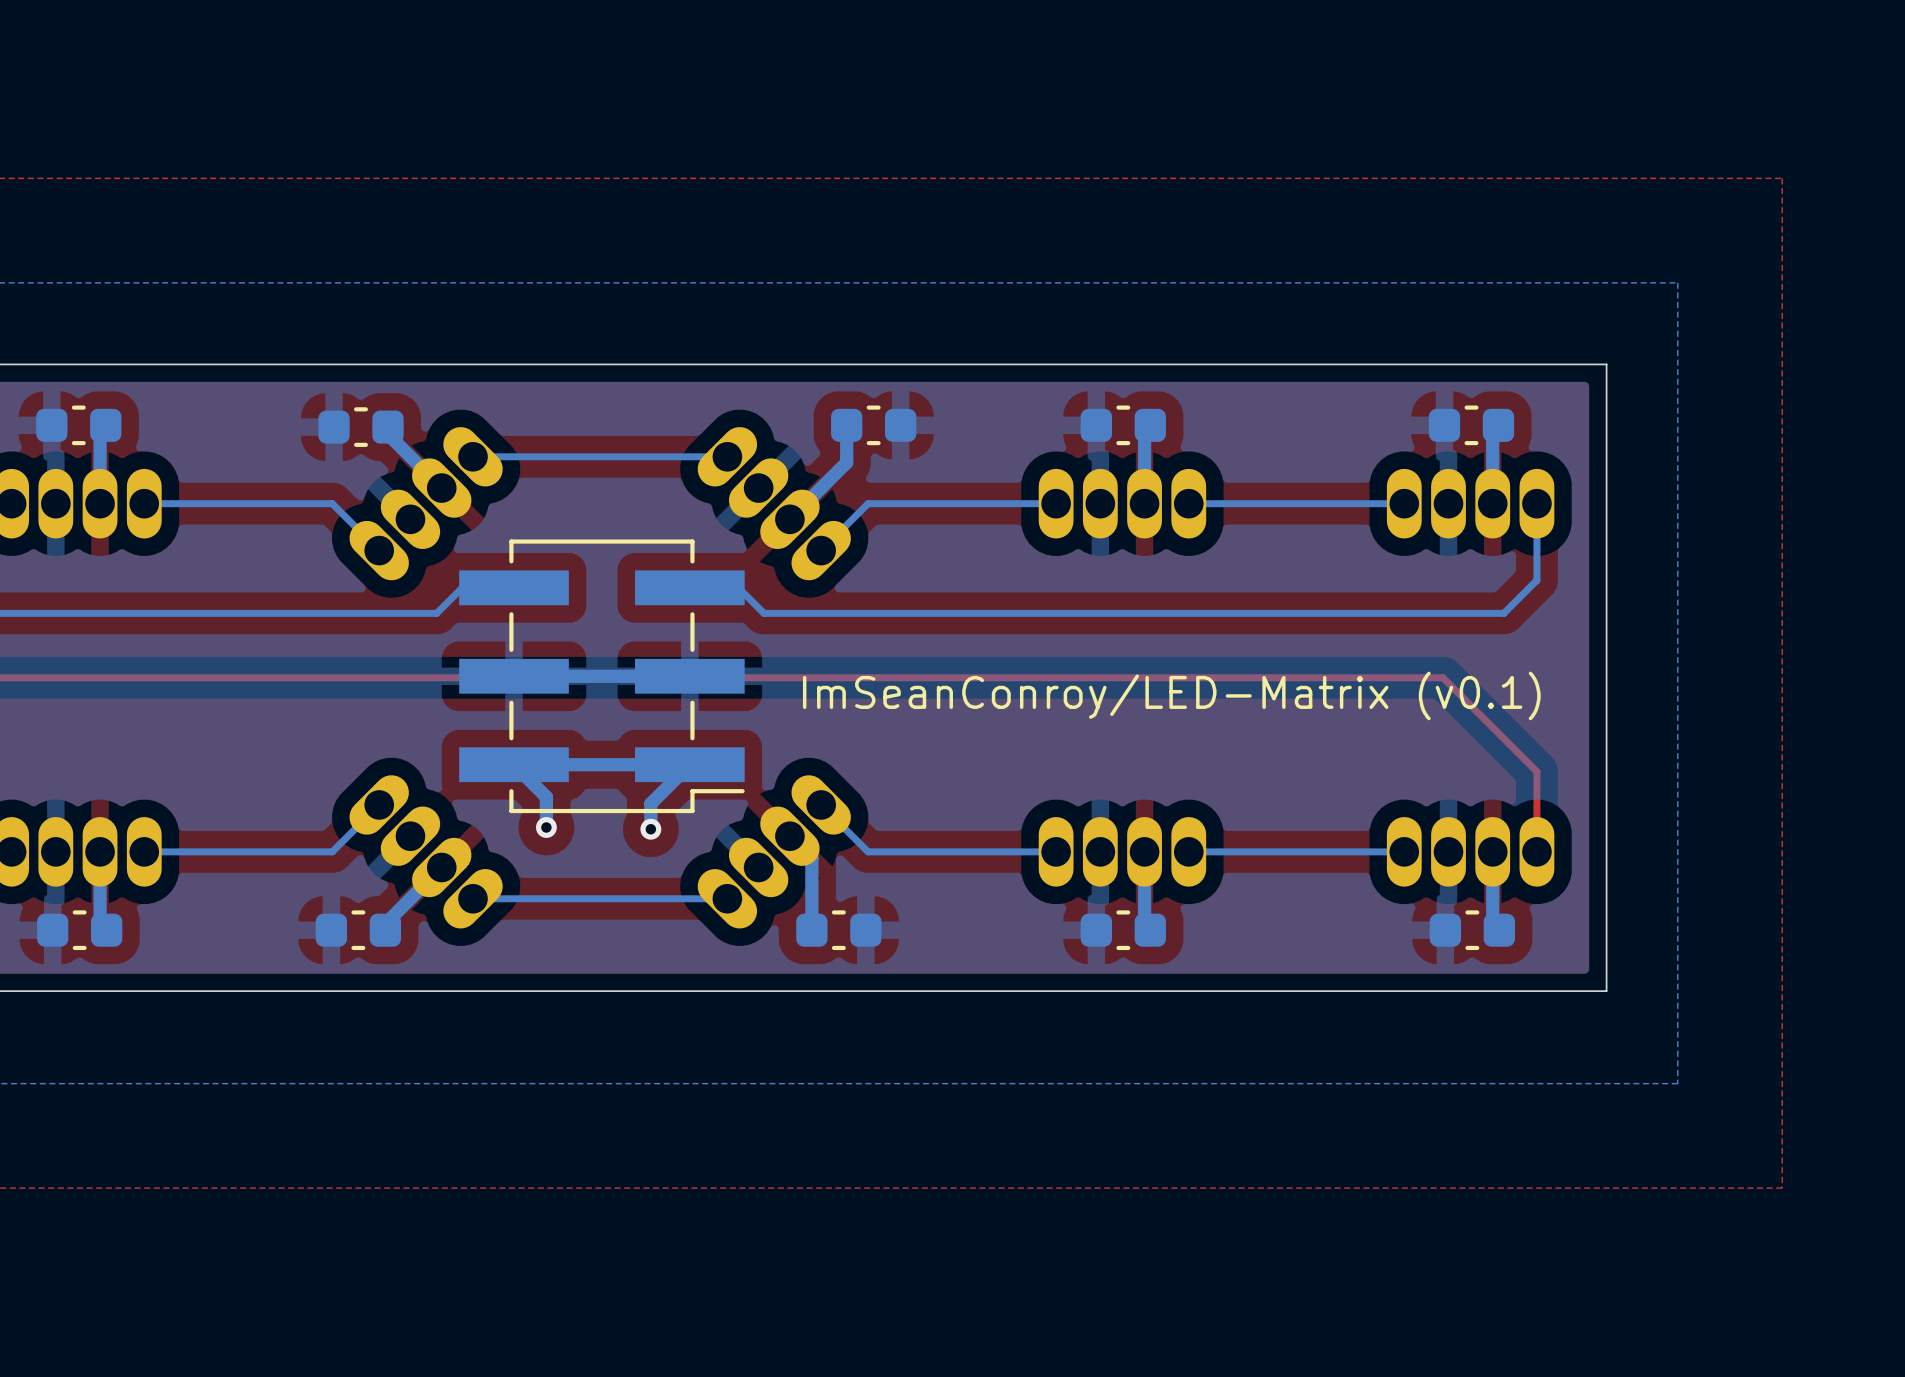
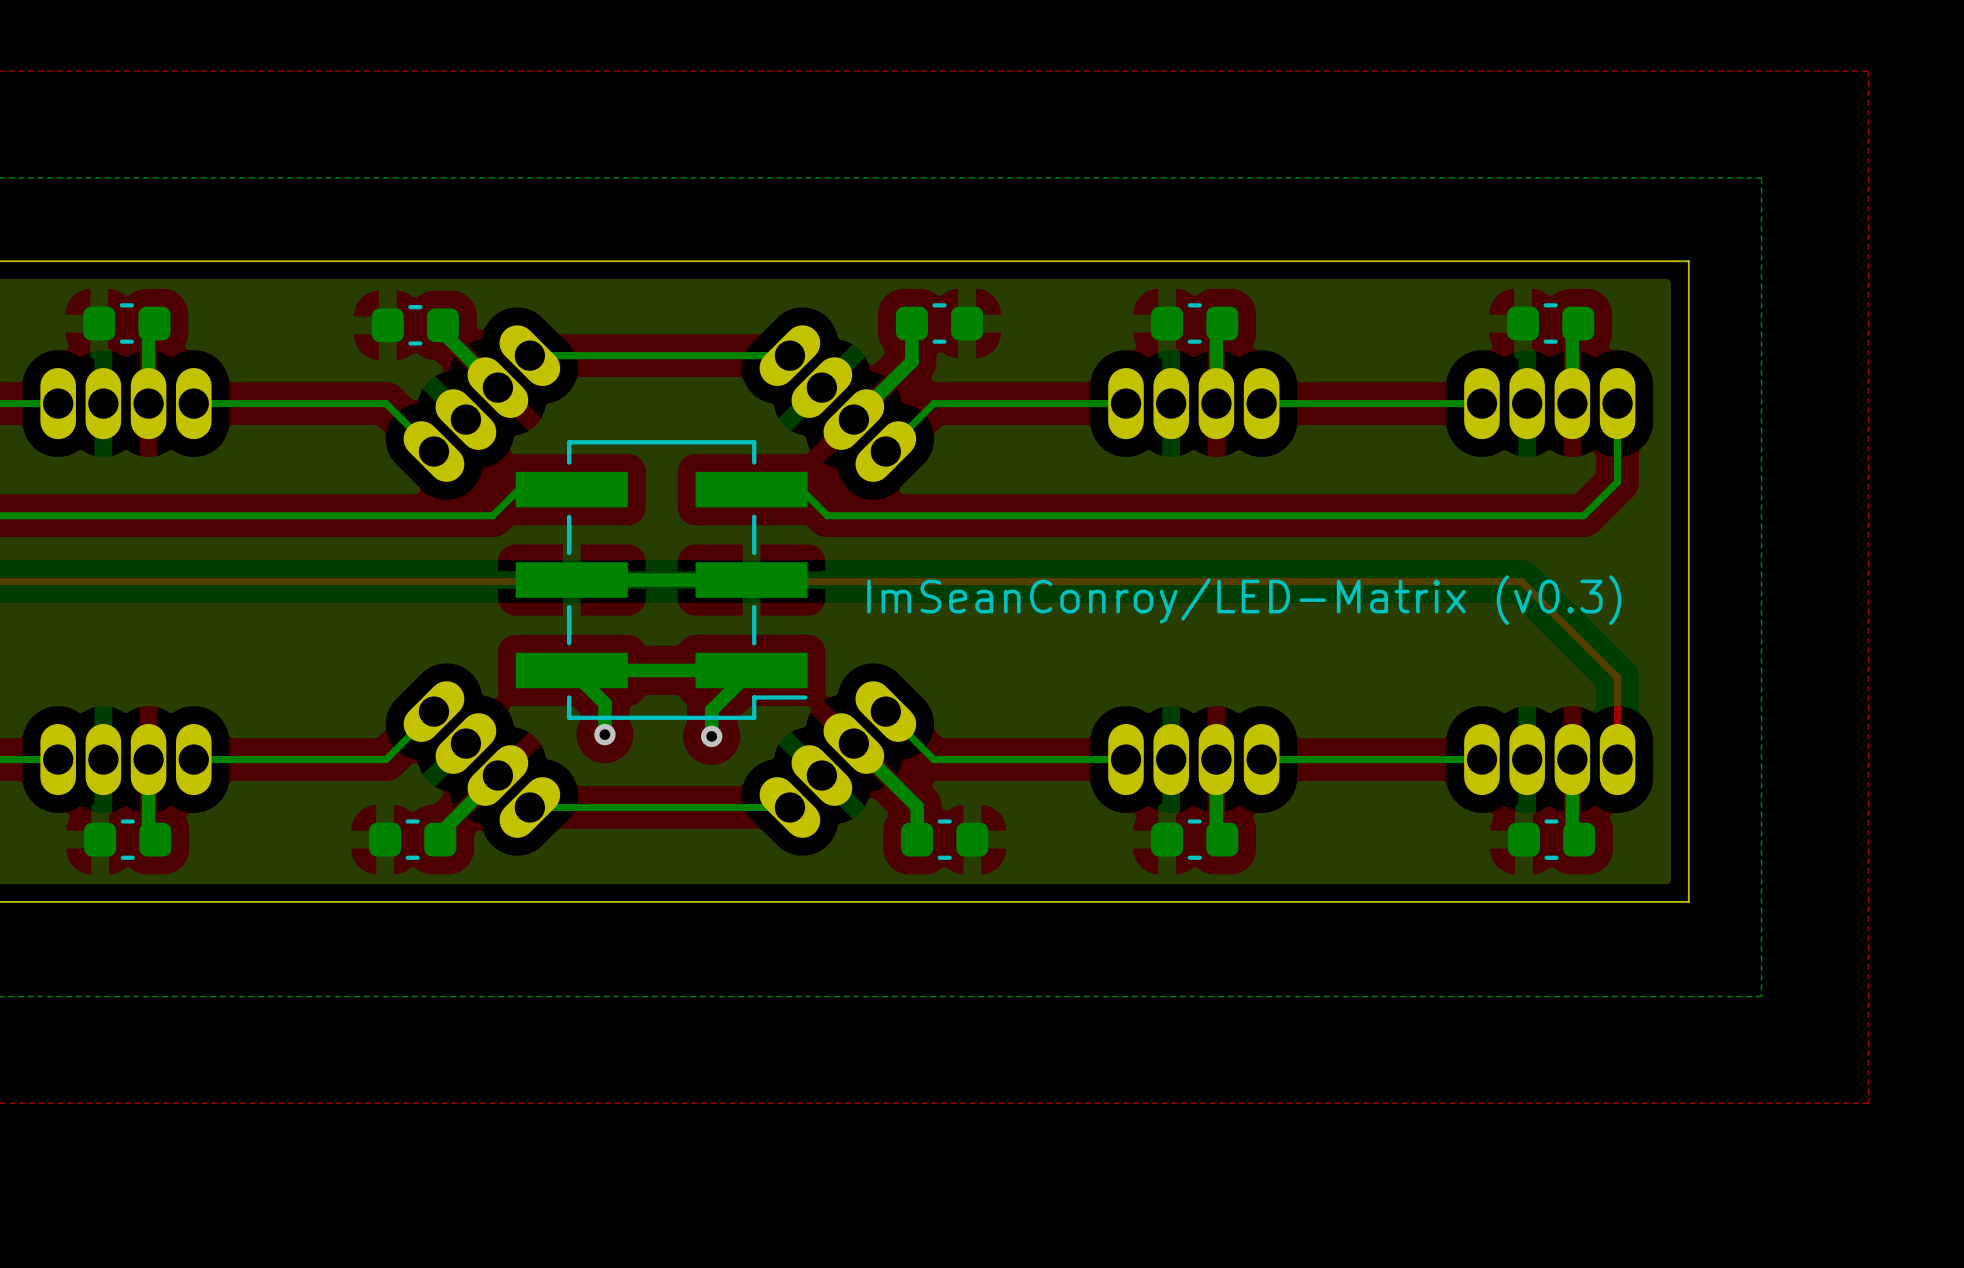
text: ImSeanConroy/LED-Matrix (v0.1) (1171, 695) -> ImSeanConroy/LED-Matrix (v0.3) (1244, 600)
bottom track: (811, 858) (811, 930) -> (876, 766) (917, 806) (917, 839)
part position: (838, 930) -> (944, 839)

